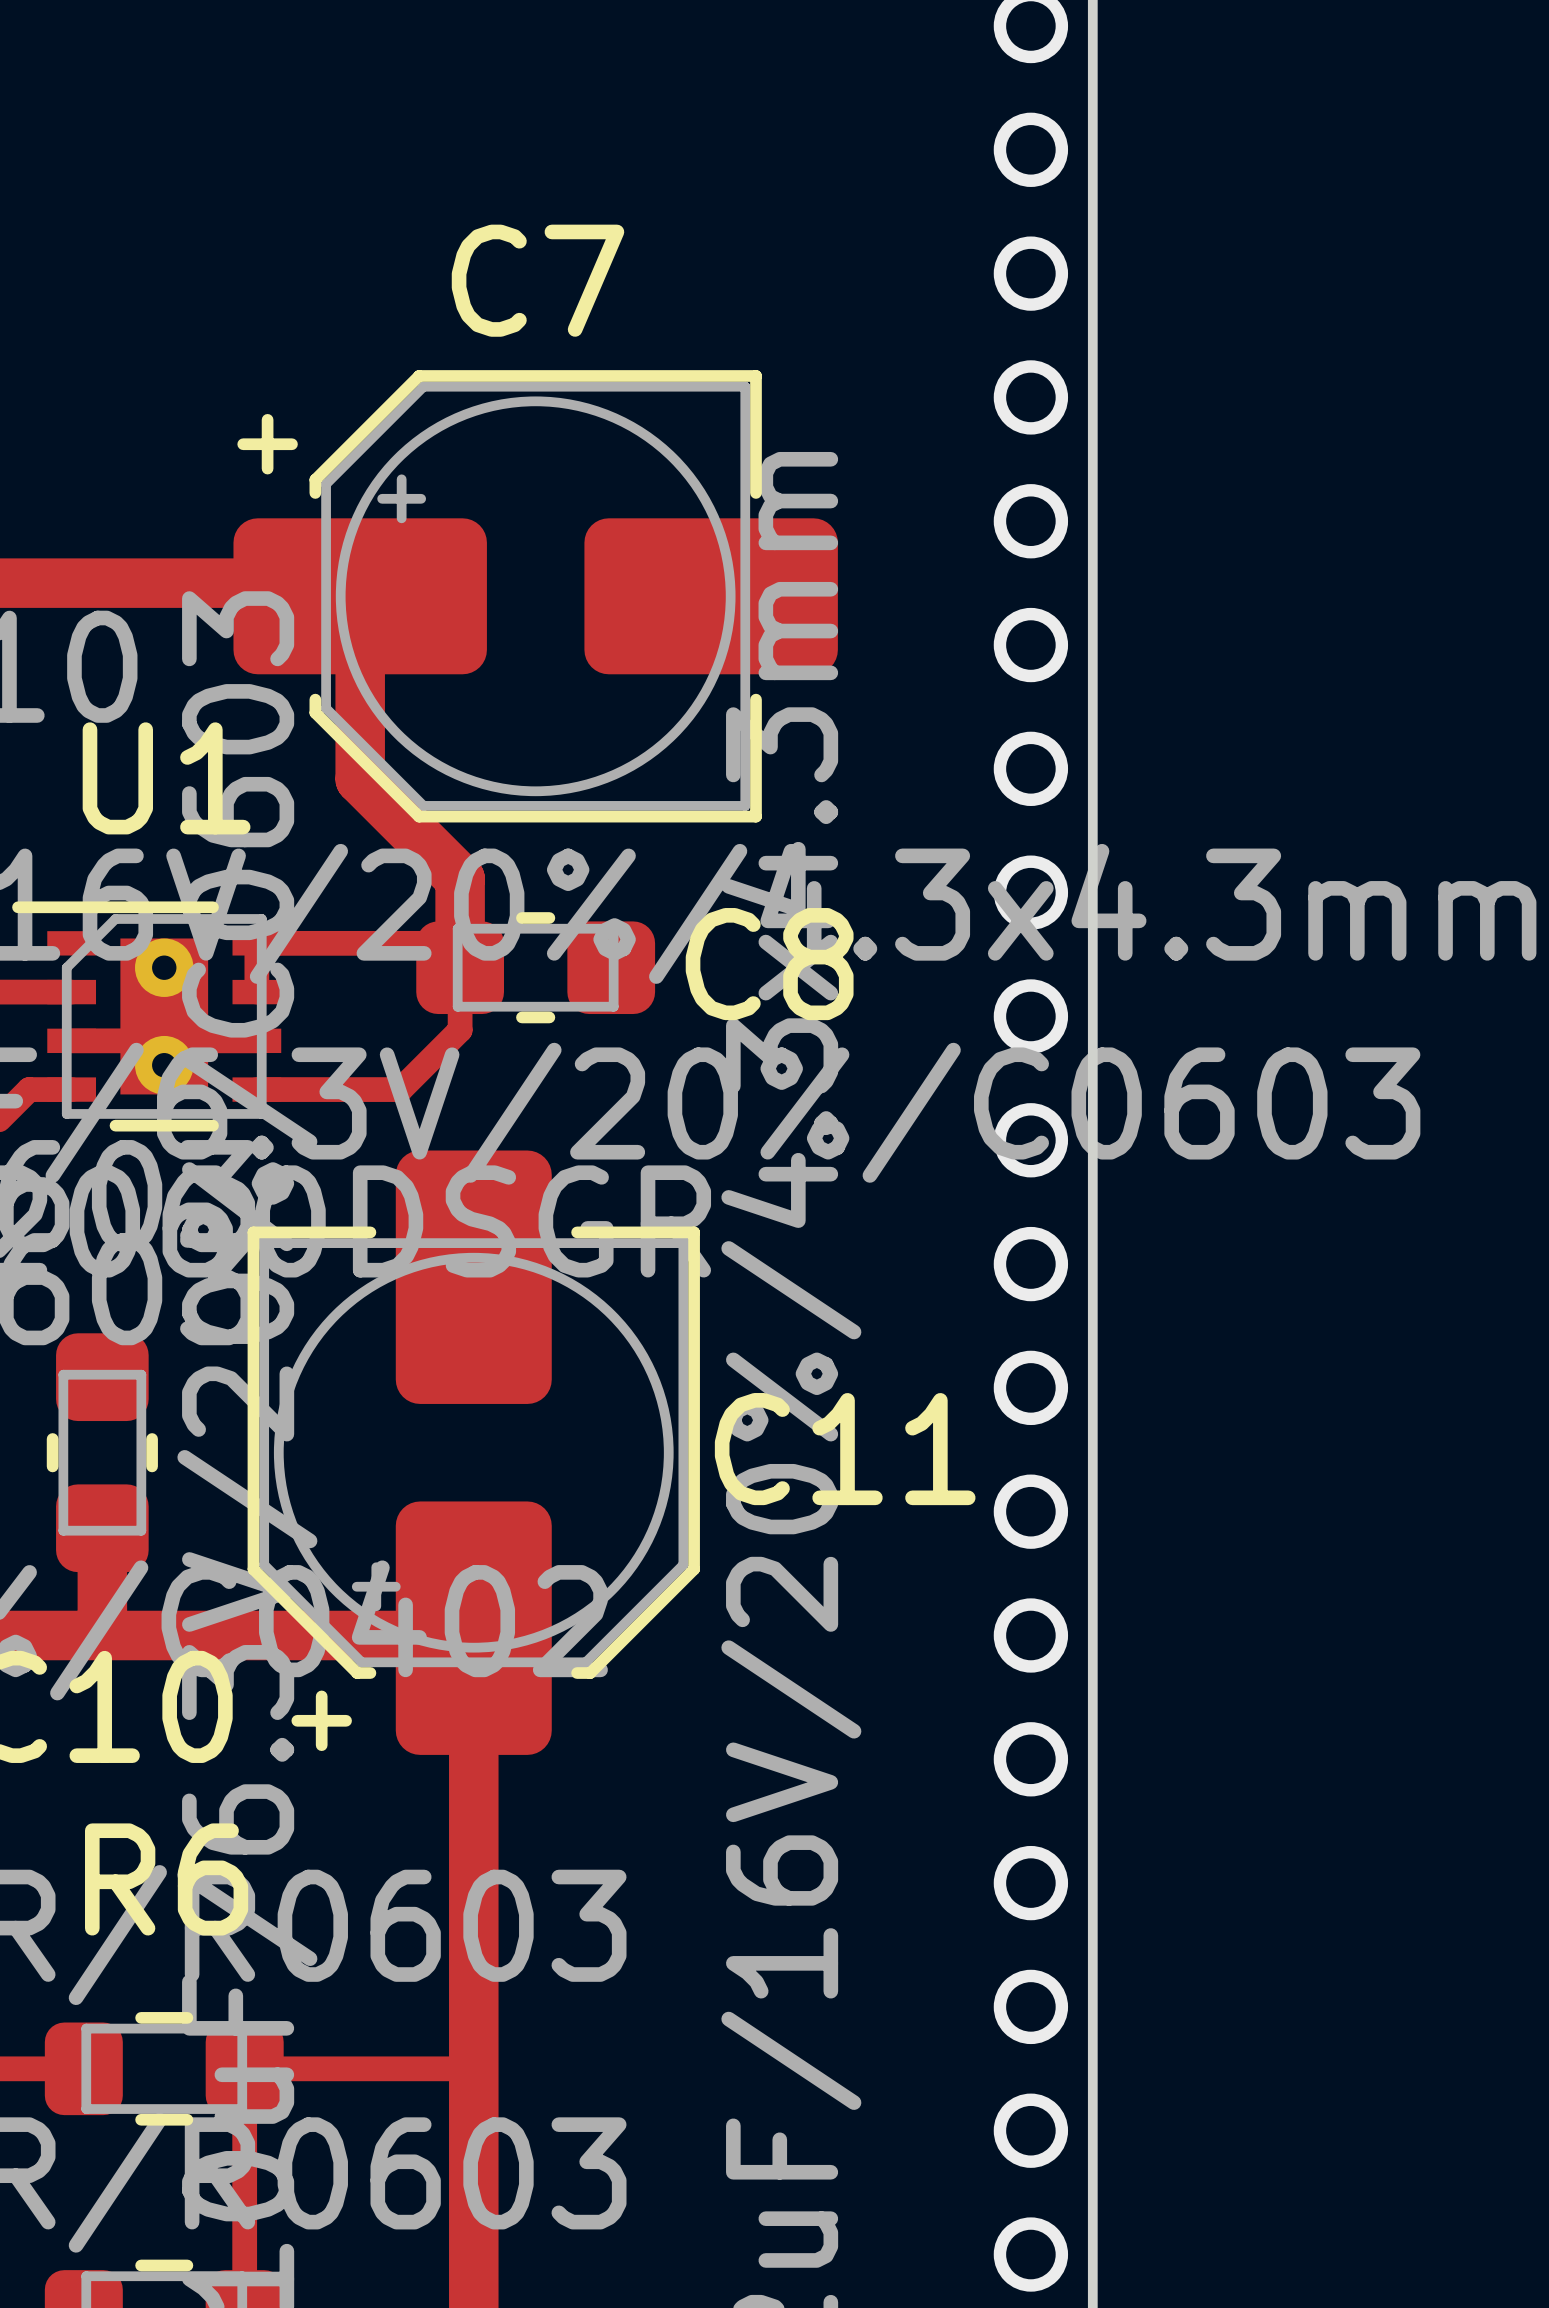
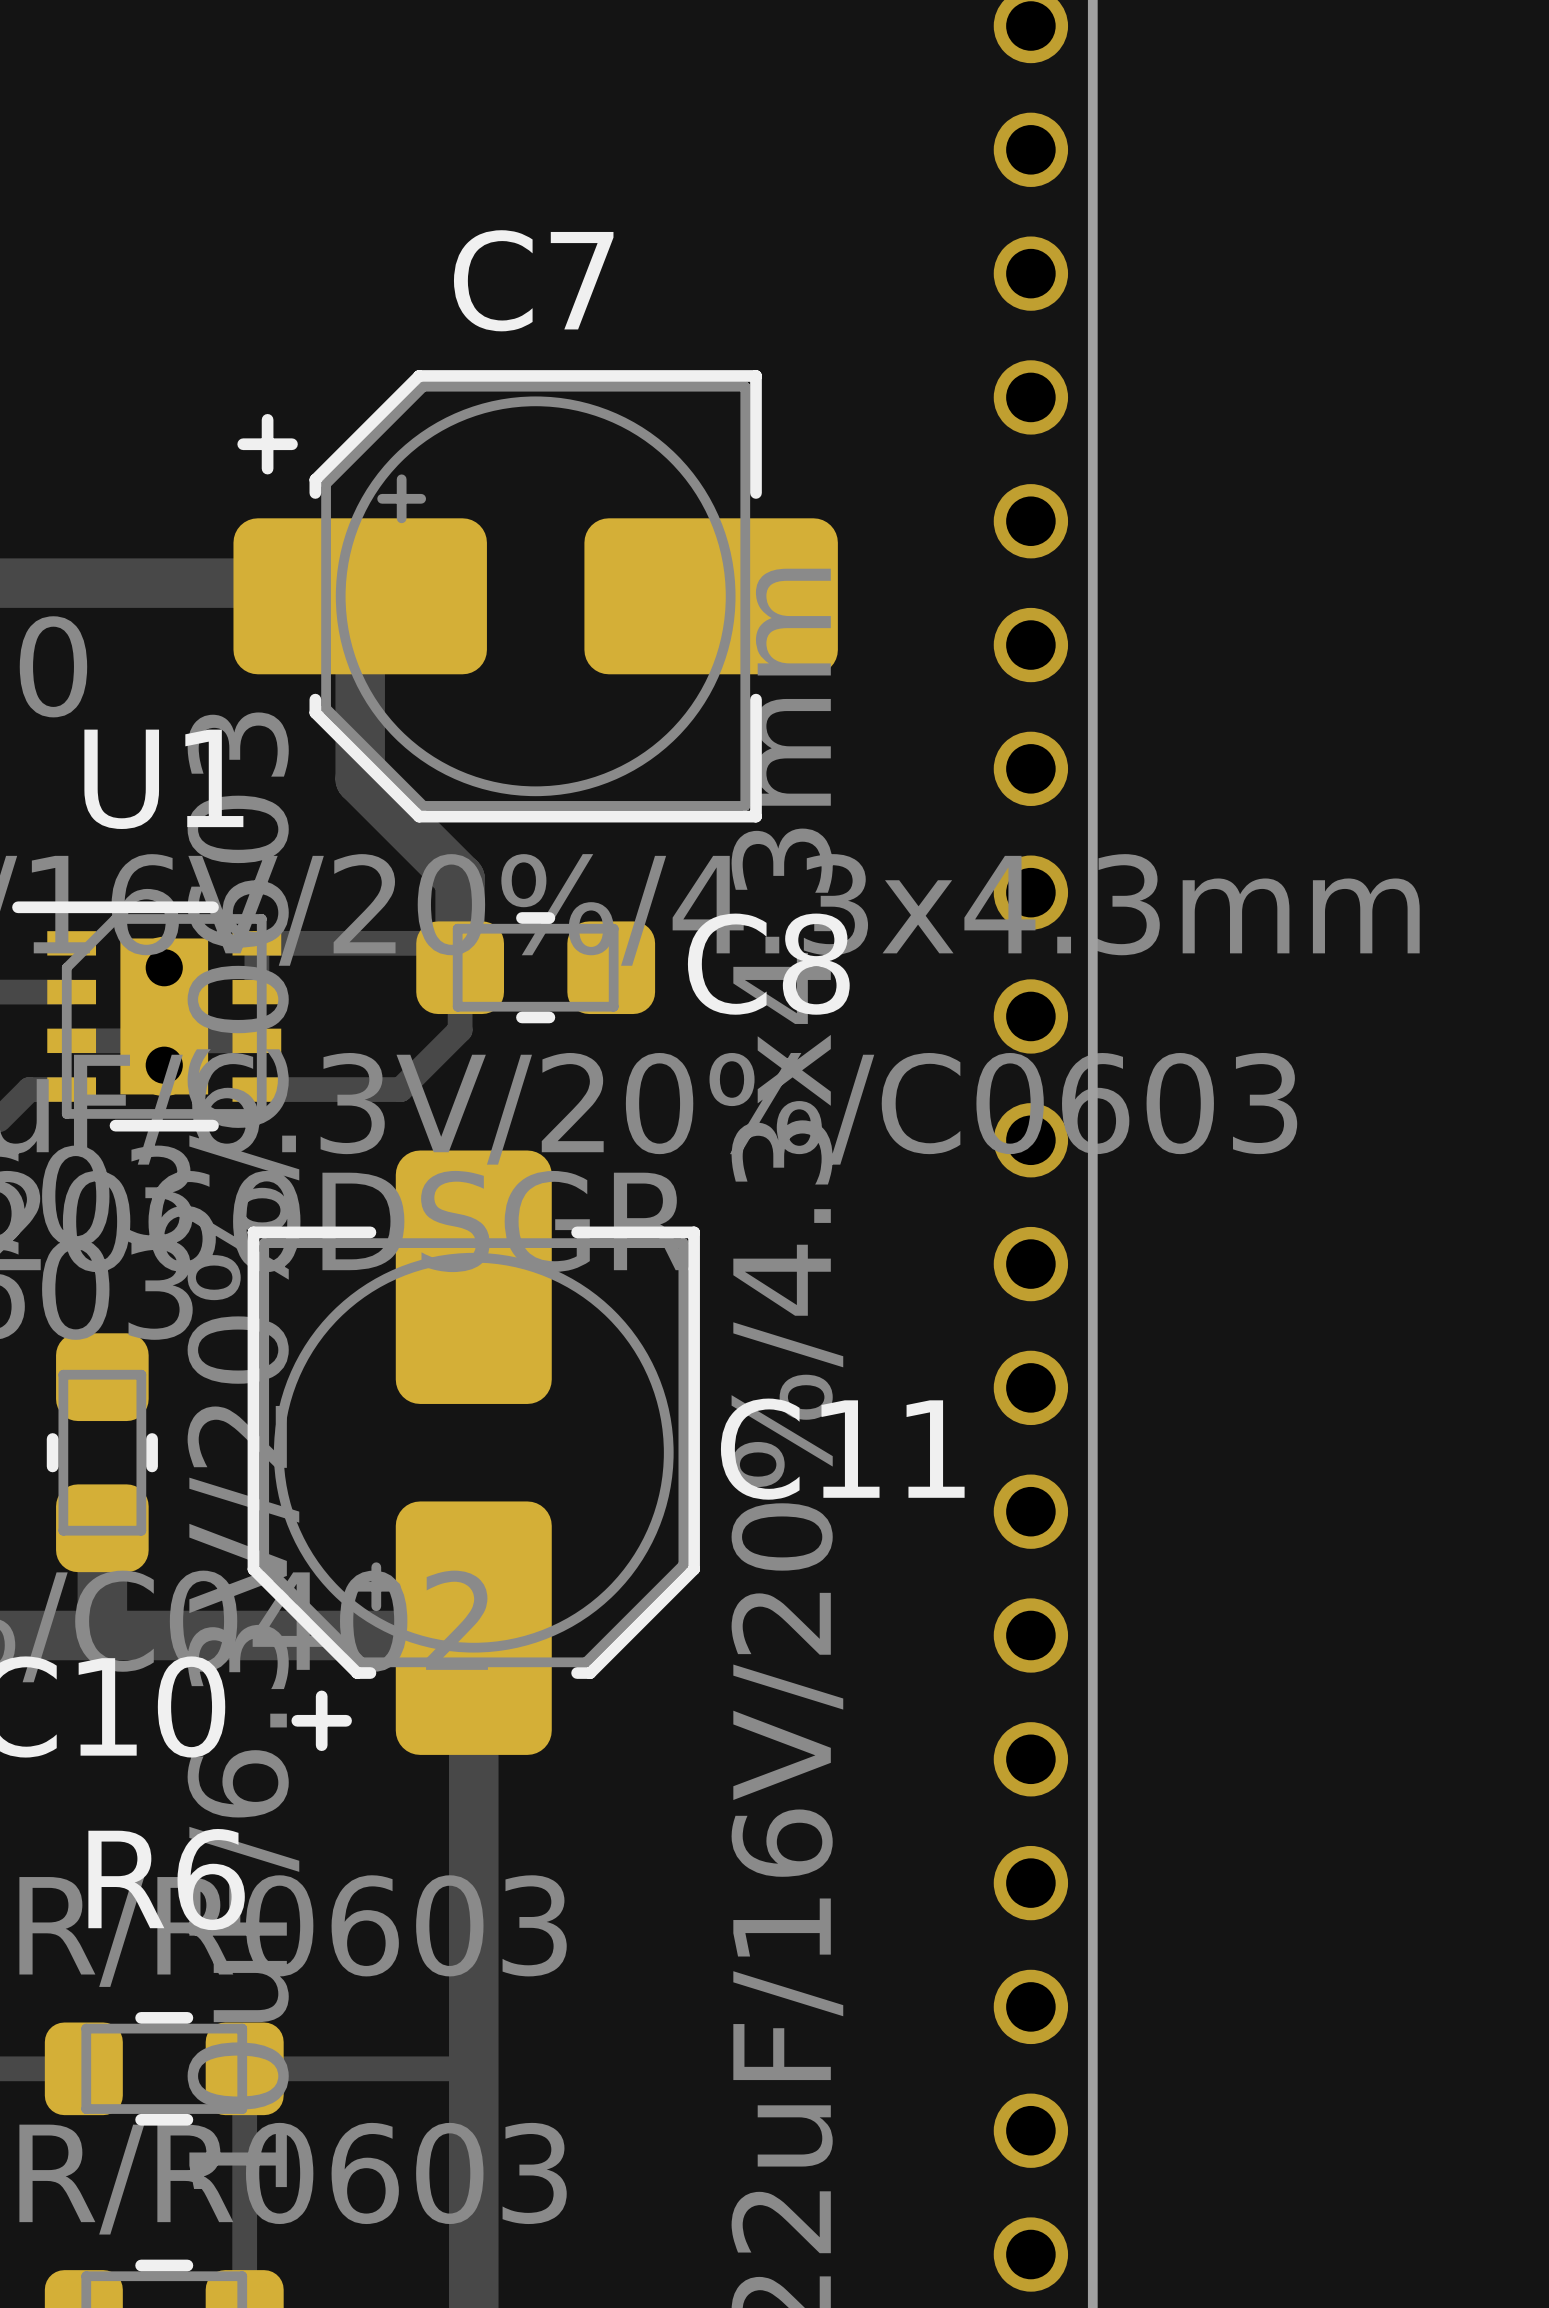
U1 footprint: [12, 901, 282, 1132] -> [12, 901, 282, 1132]

